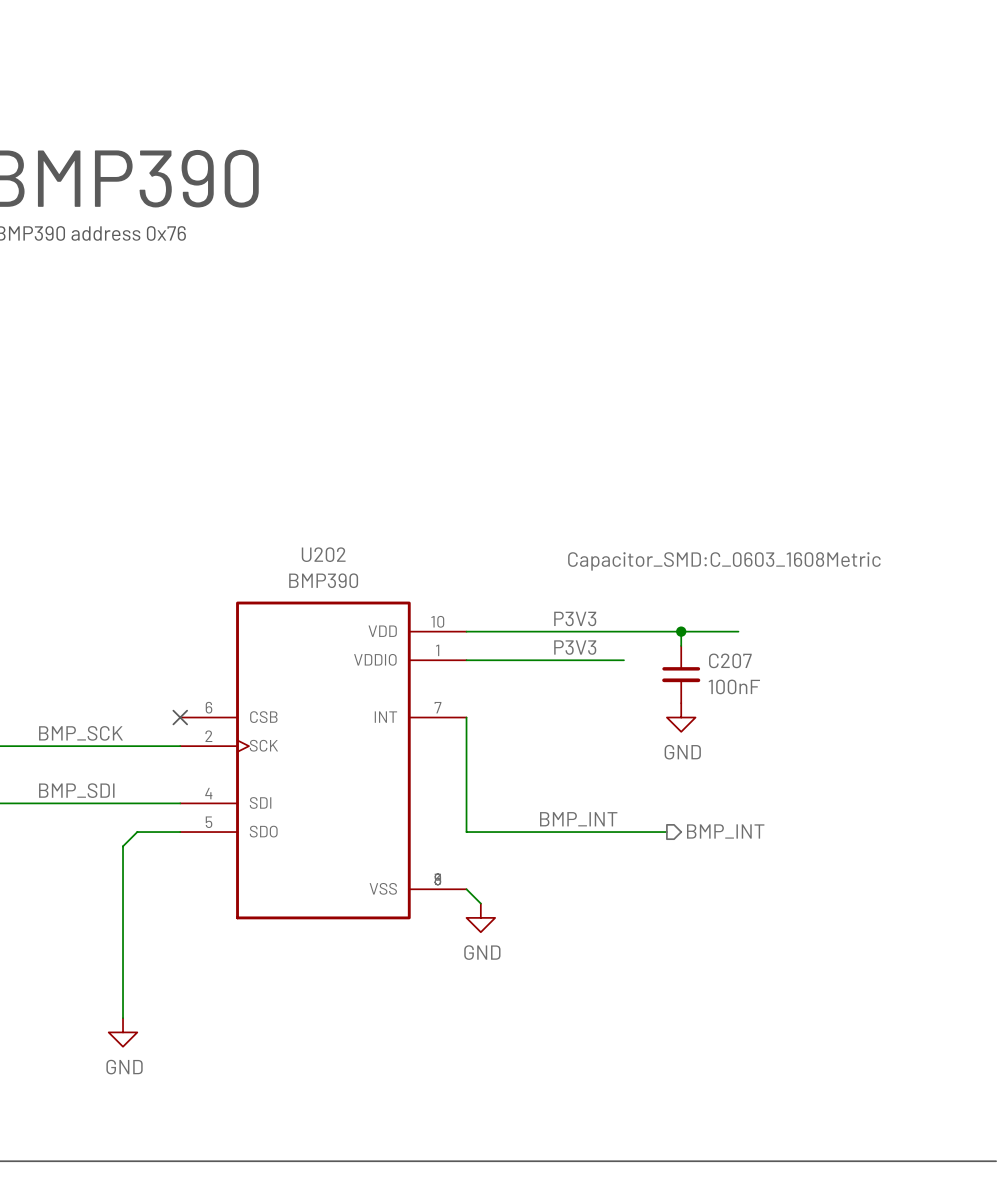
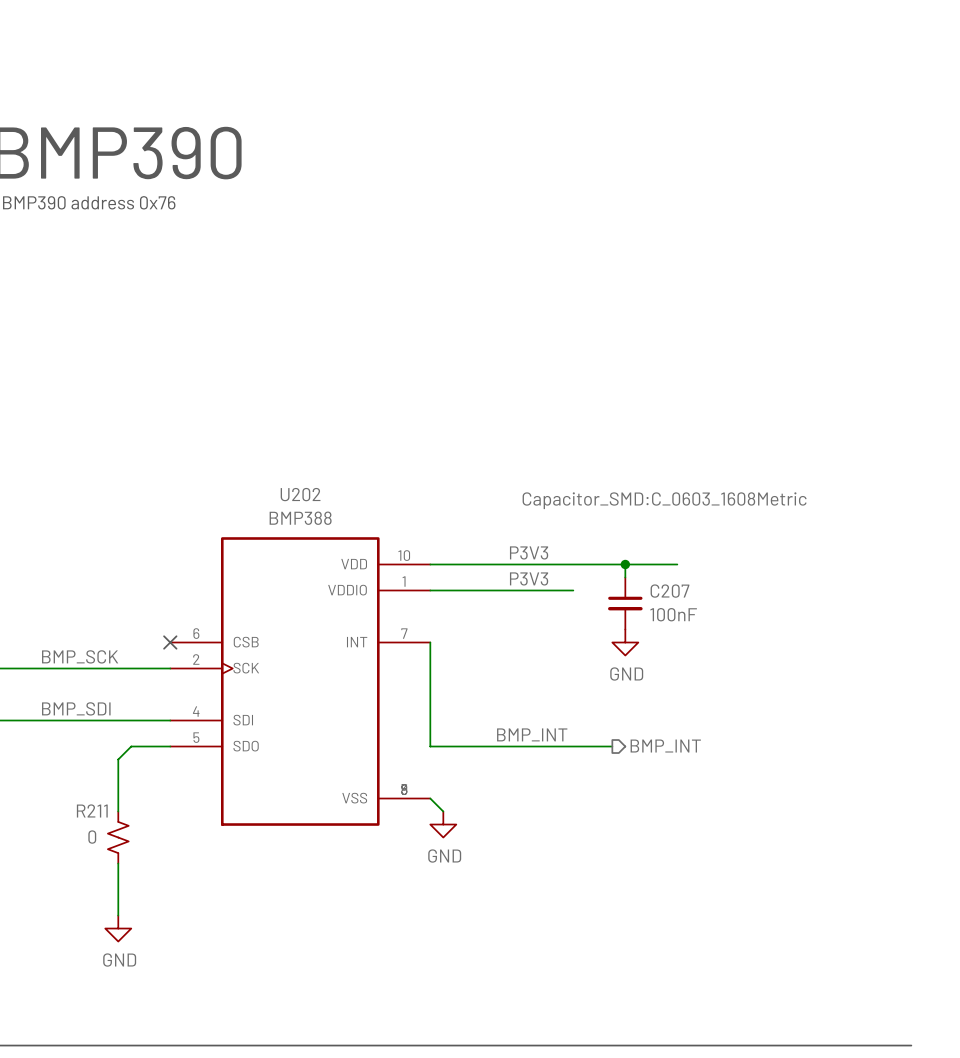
U202 value: BMP390 (323, 580) -> BMP388 (300, 518)
R211: none -> 0 (118, 837)

